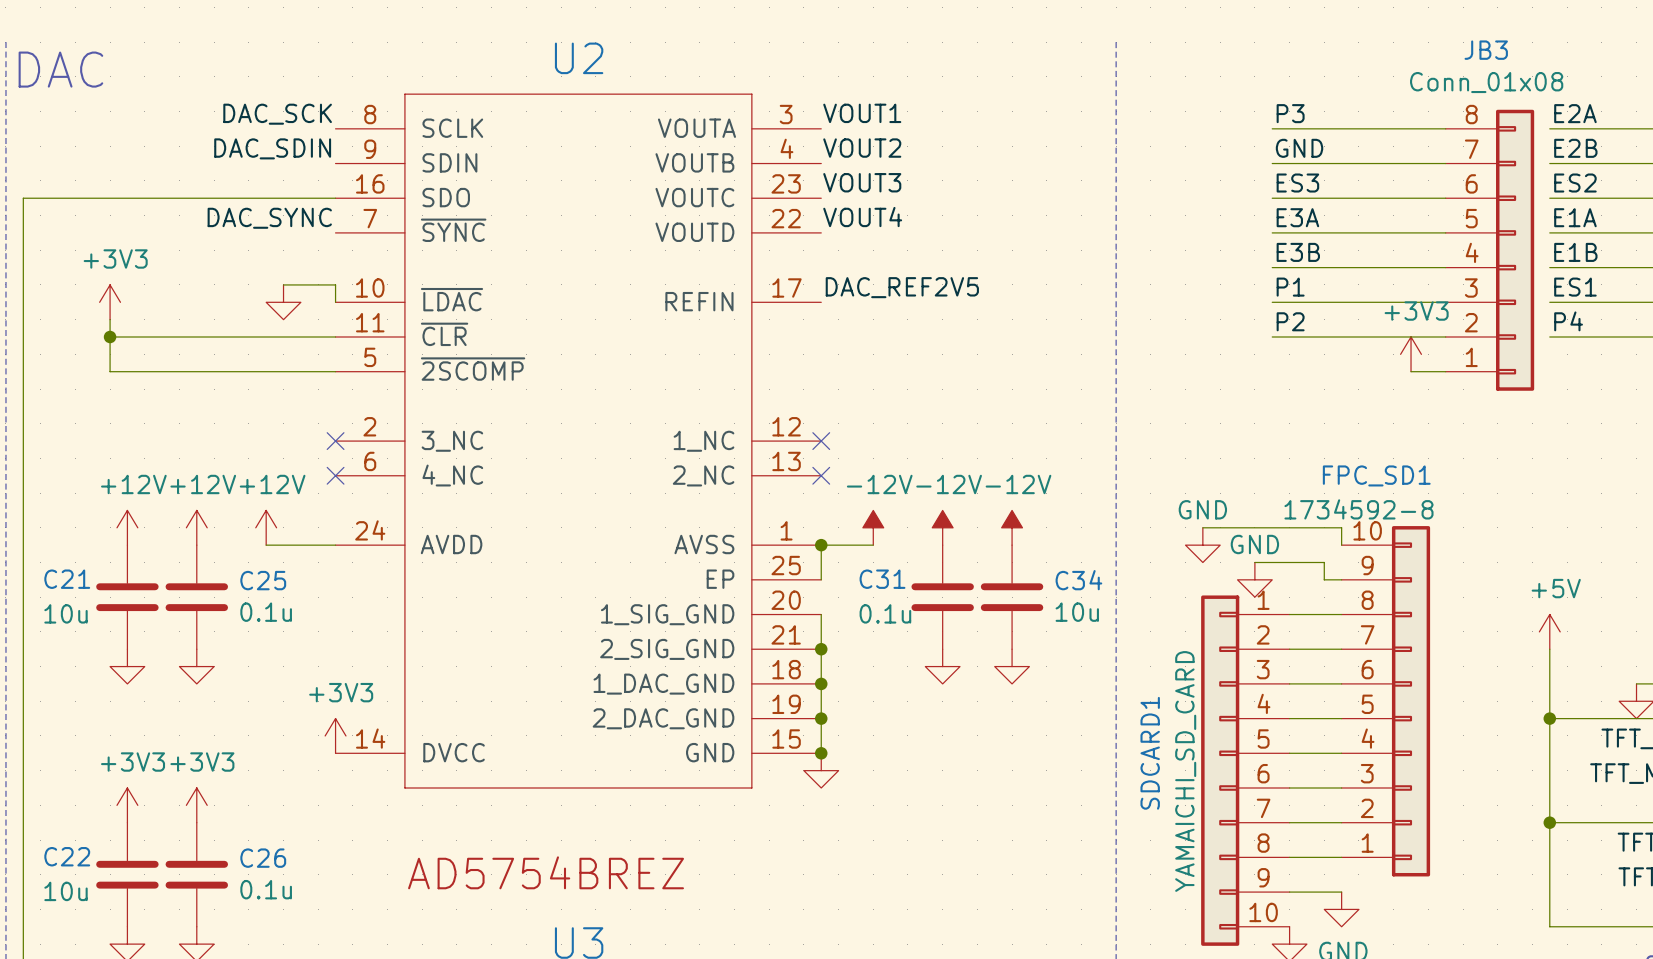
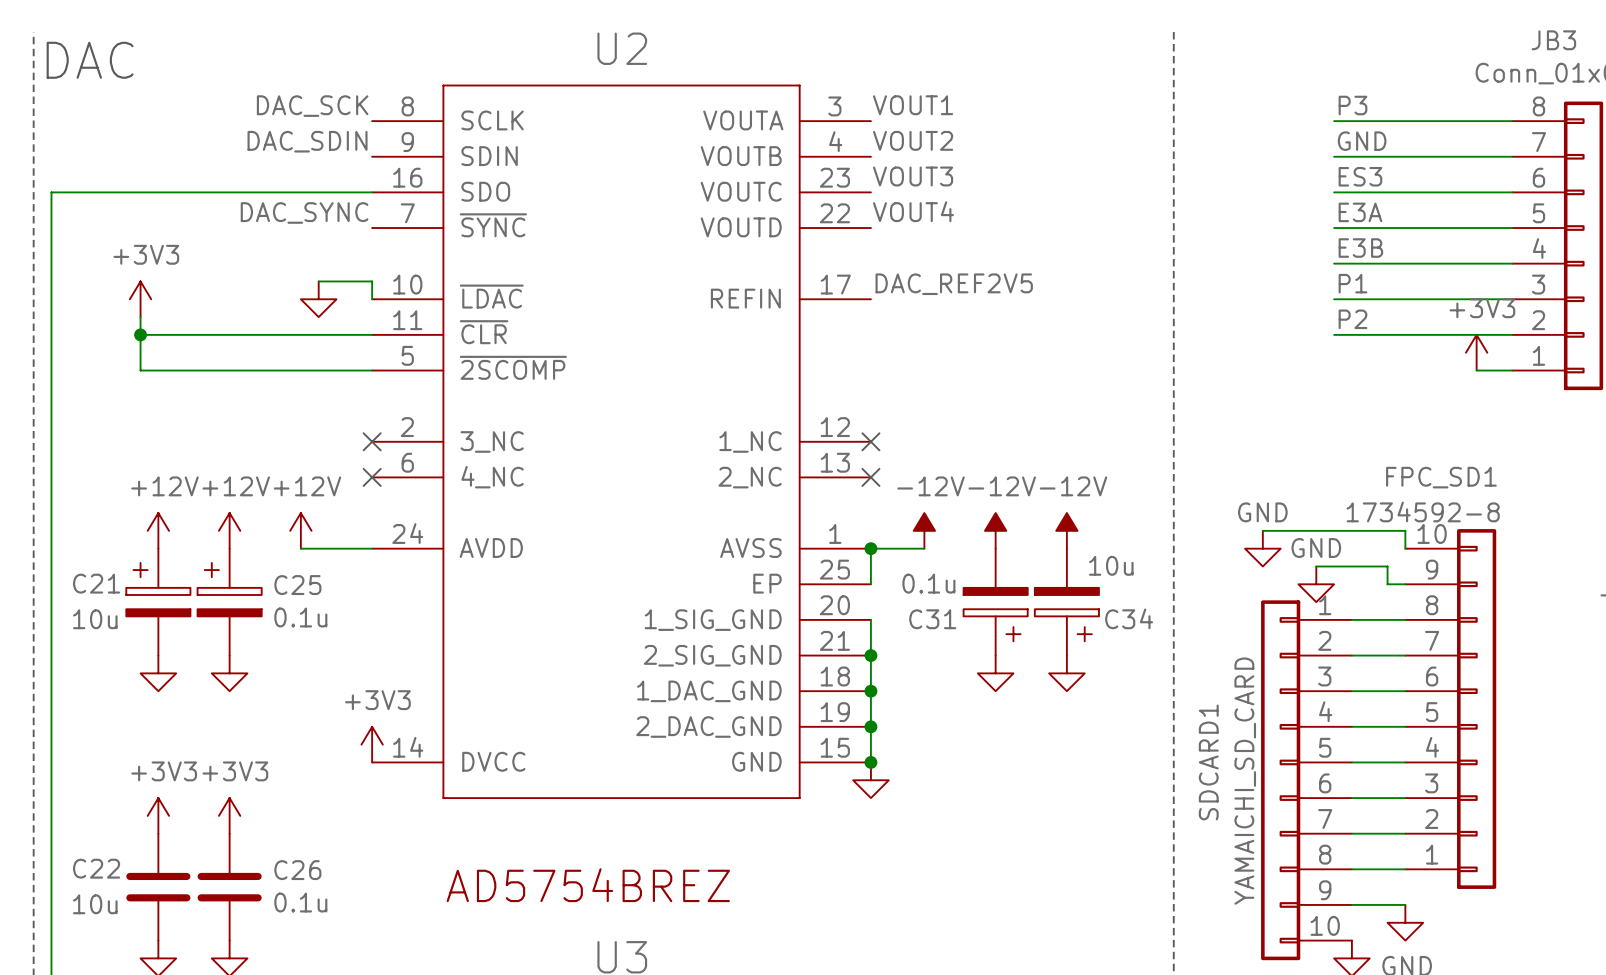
C21 symbol: [96, 545, 159, 650] -> [126, 548, 191, 656]
C25 symbol: [165, 545, 229, 650] -> [197, 548, 262, 656]
C31 symbol: [911, 545, 974, 650] -> [963, 548, 1028, 656]
C34 symbol: [980, 545, 1044, 650] -> [1034, 548, 1099, 656]
C31 name position: C31 (882, 579) -> C31 (932, 619)
C34 name position: C34 (1078, 580) -> C34 (1129, 618)
C34 value position: 10u (1077, 612) -> 10u (1111, 565)
C31 value position: 0.1u (885, 613) -> 0.1u (928, 583)

